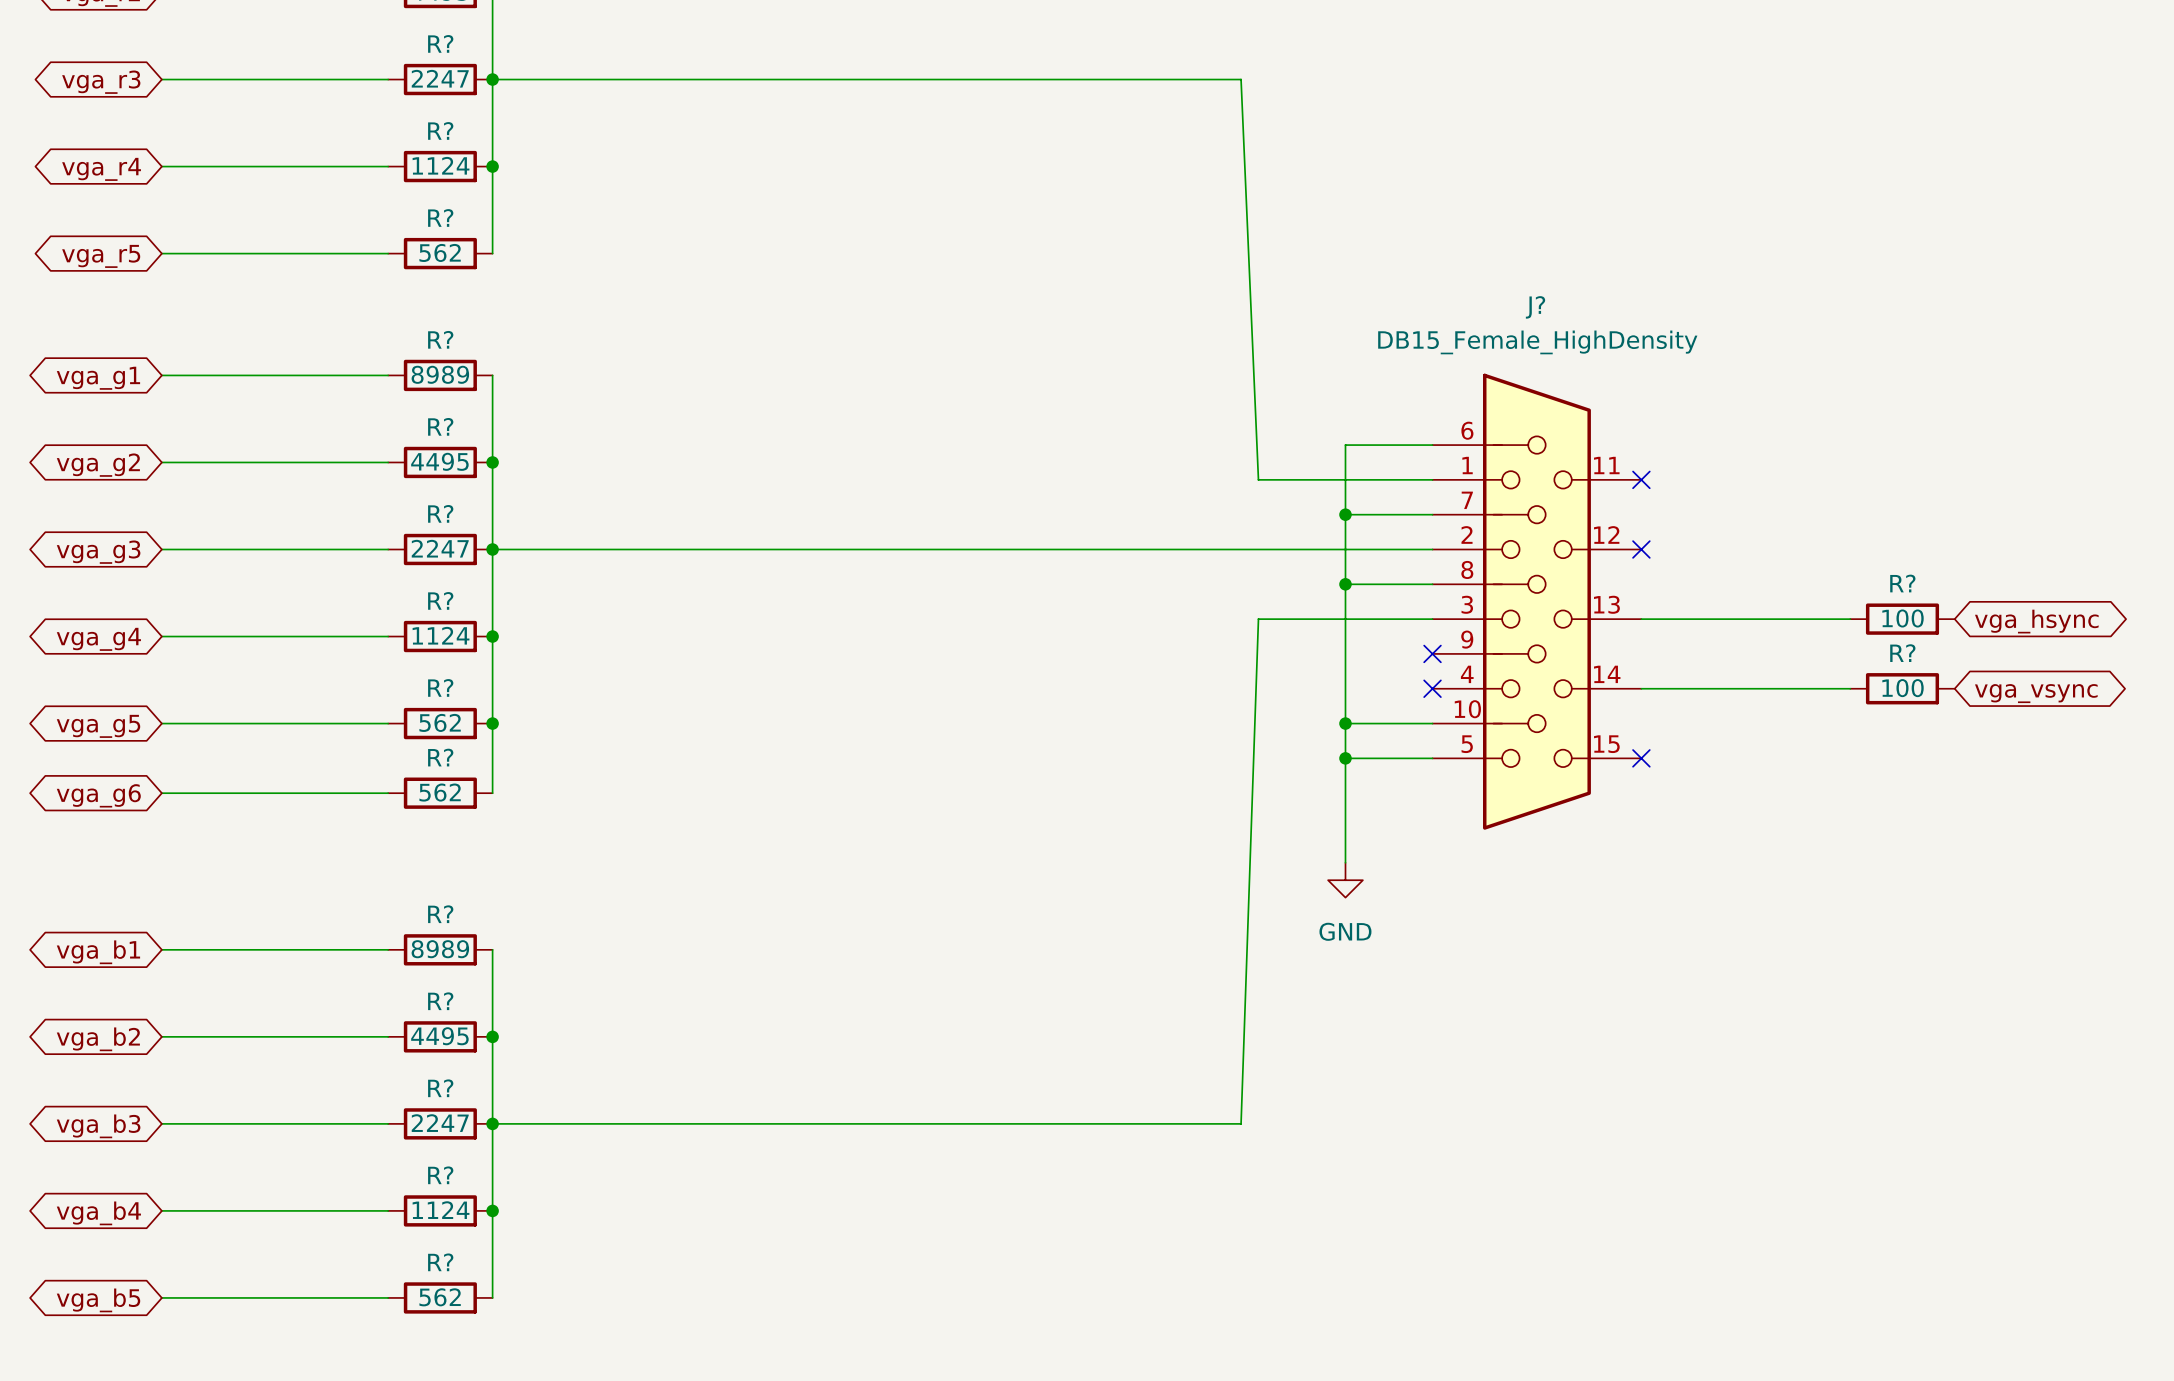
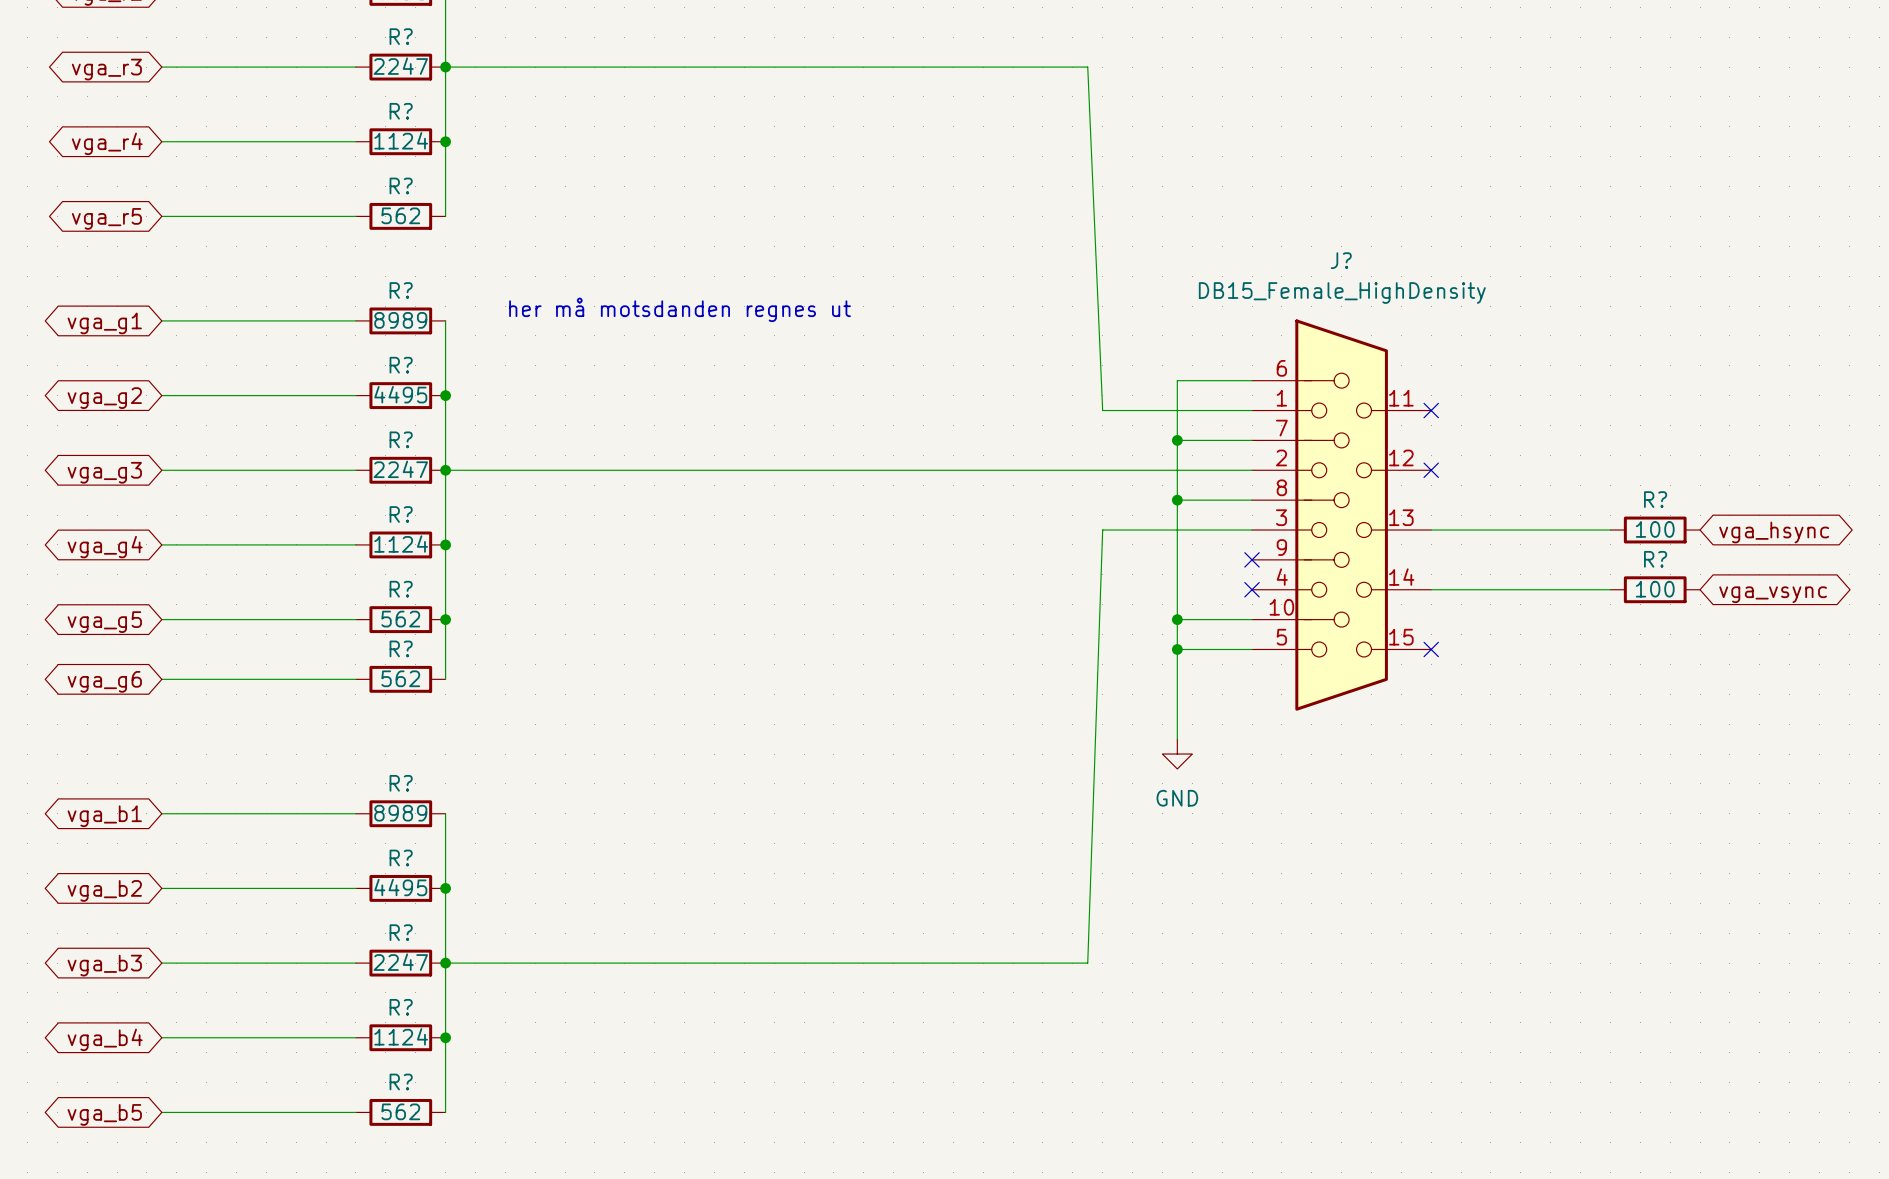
text: none -> her må motsdanden regnes ut (680, 309)

